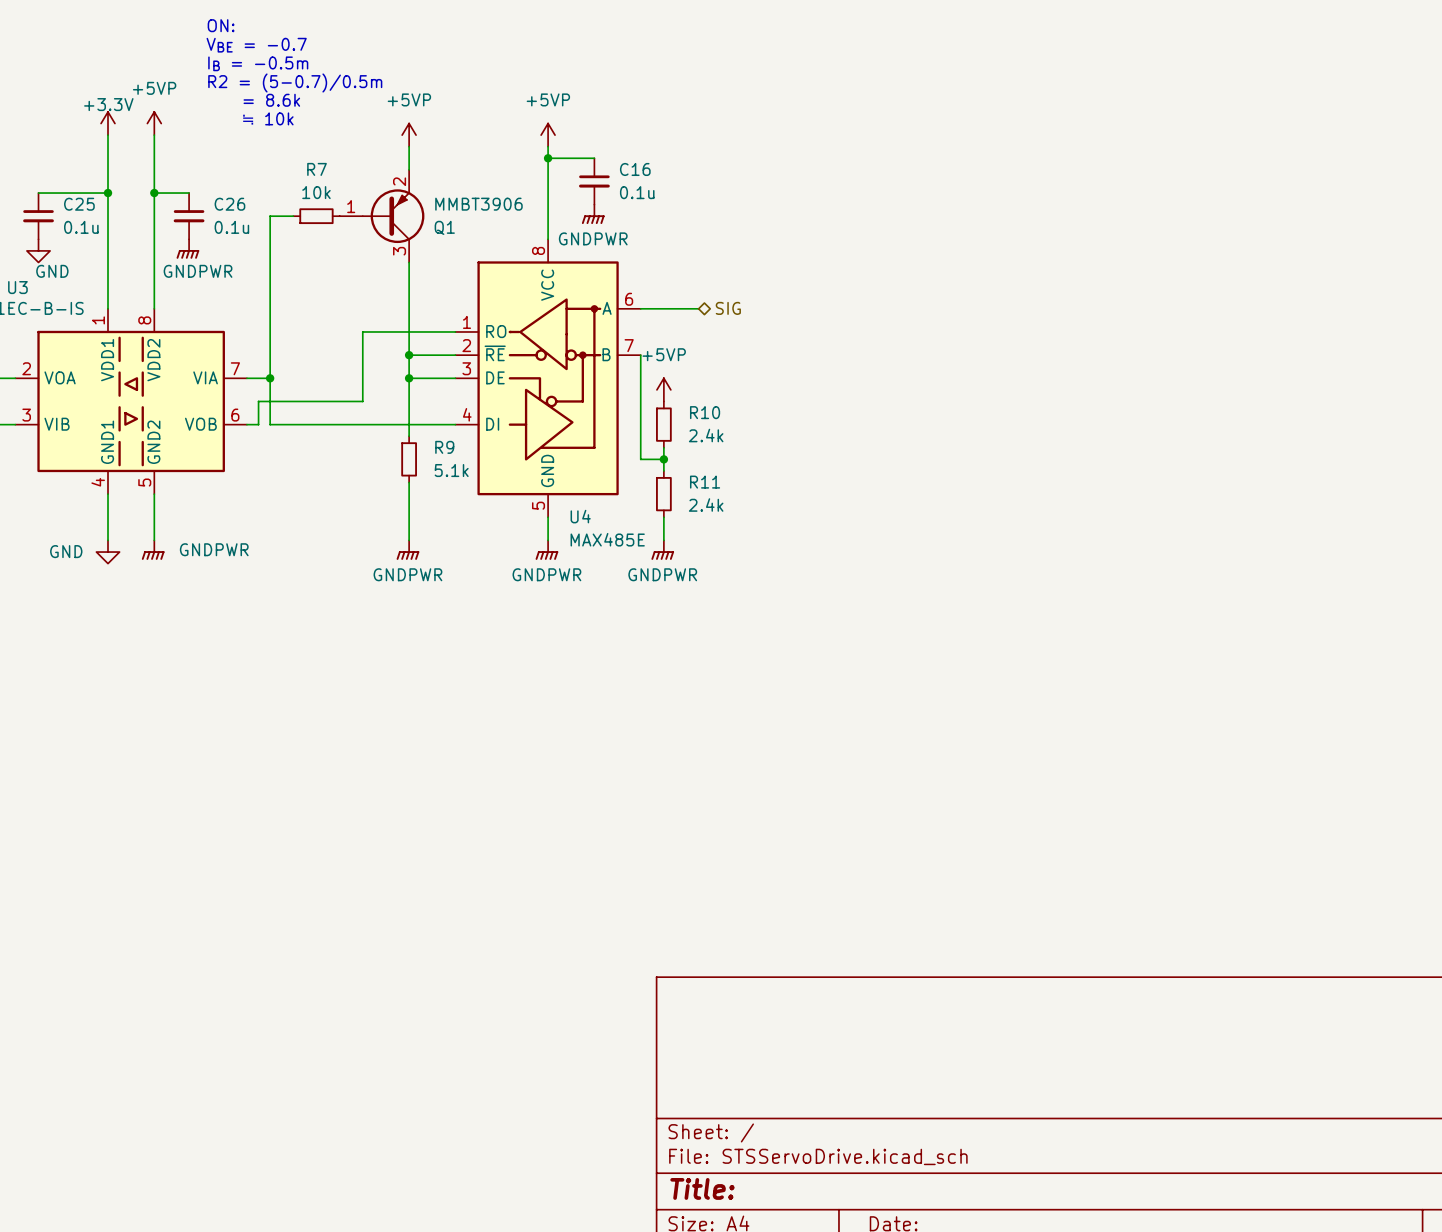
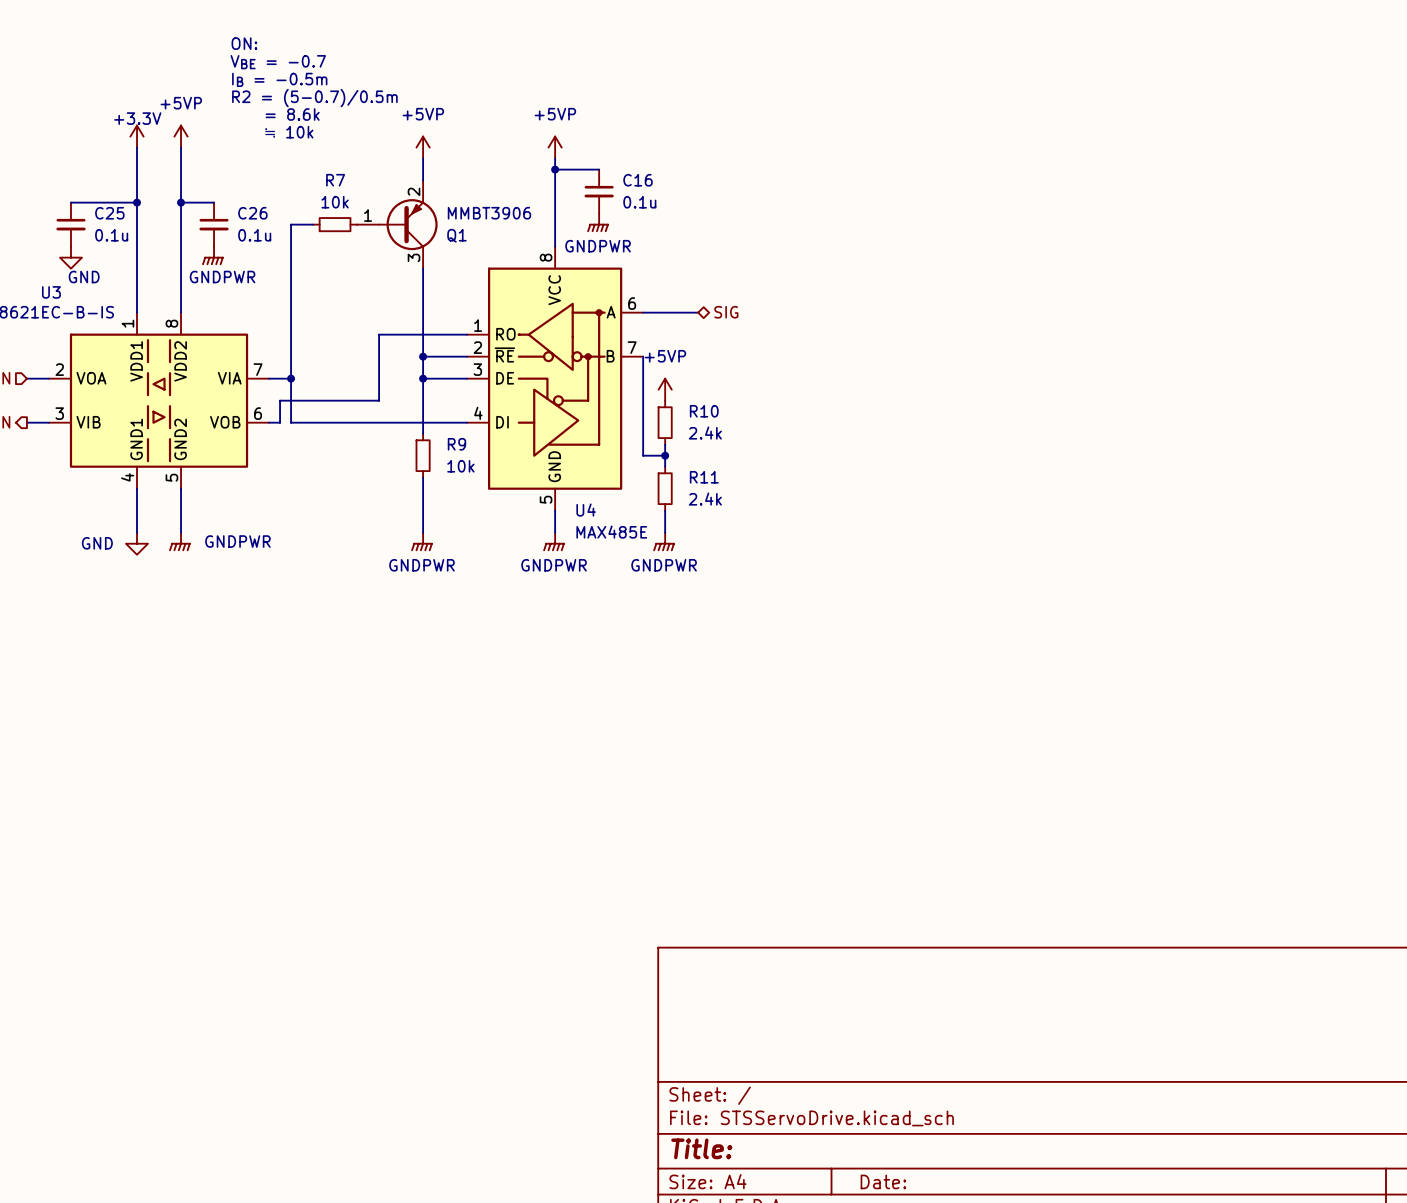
R9 value: 5.1k (451, 470) -> 10k (460, 466)

